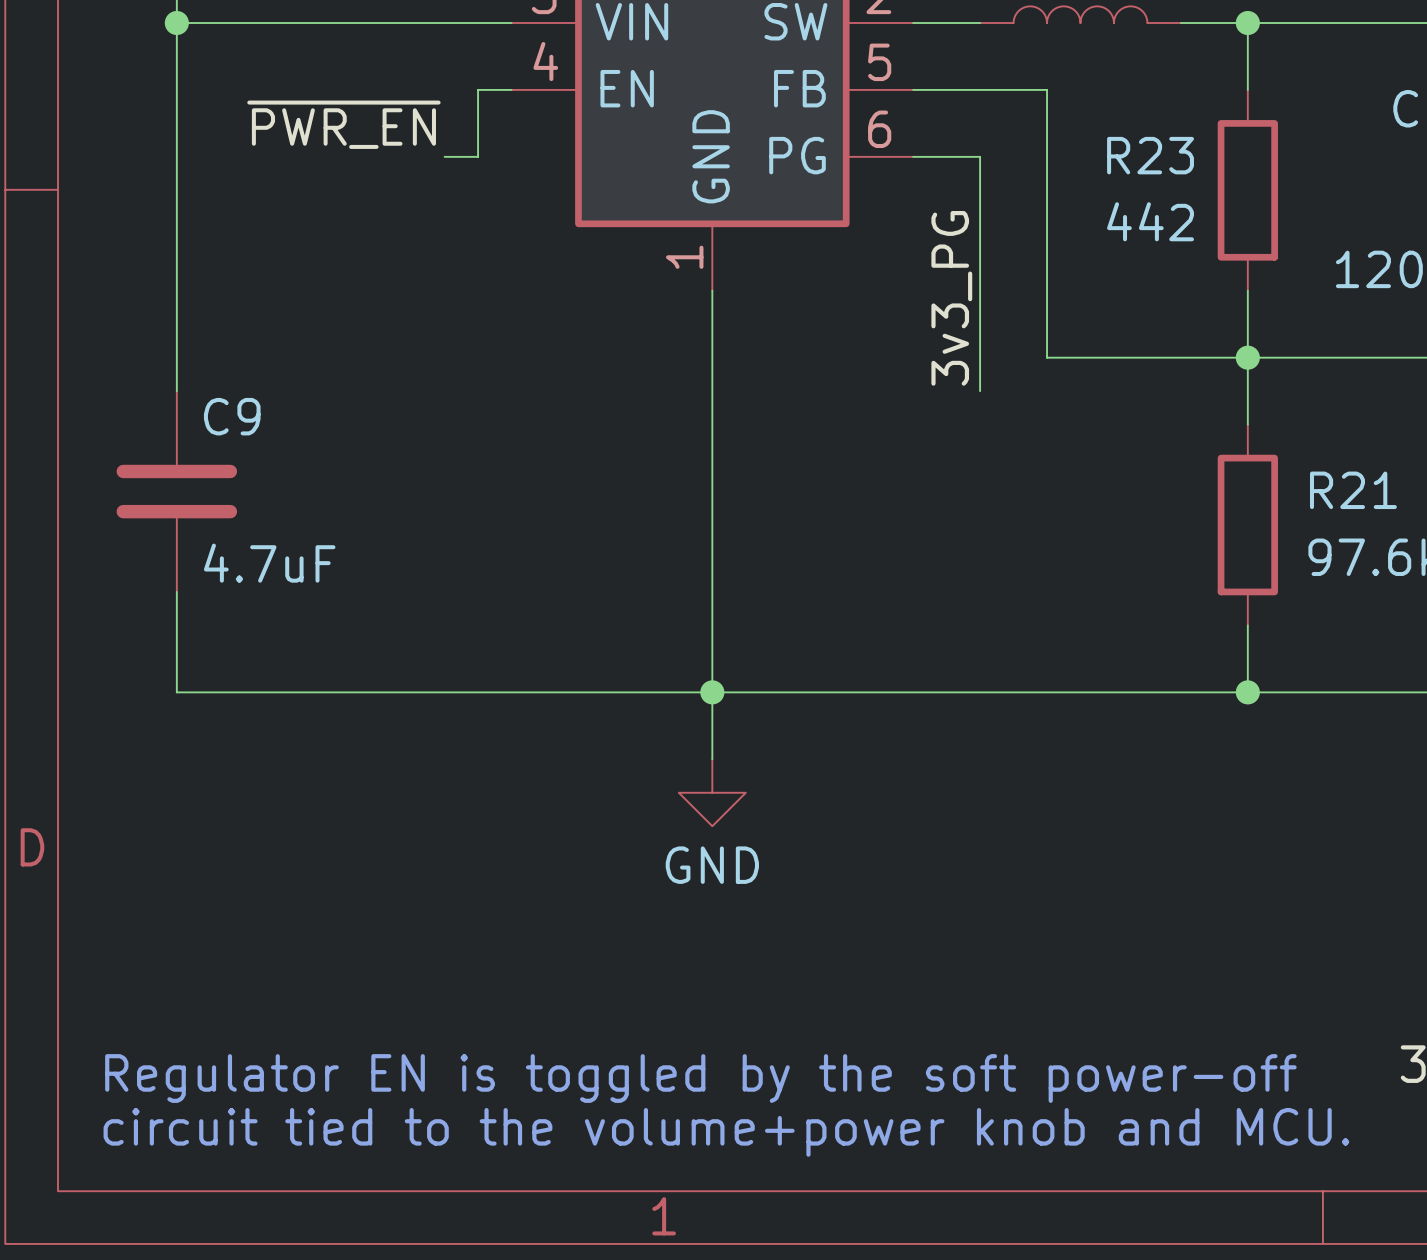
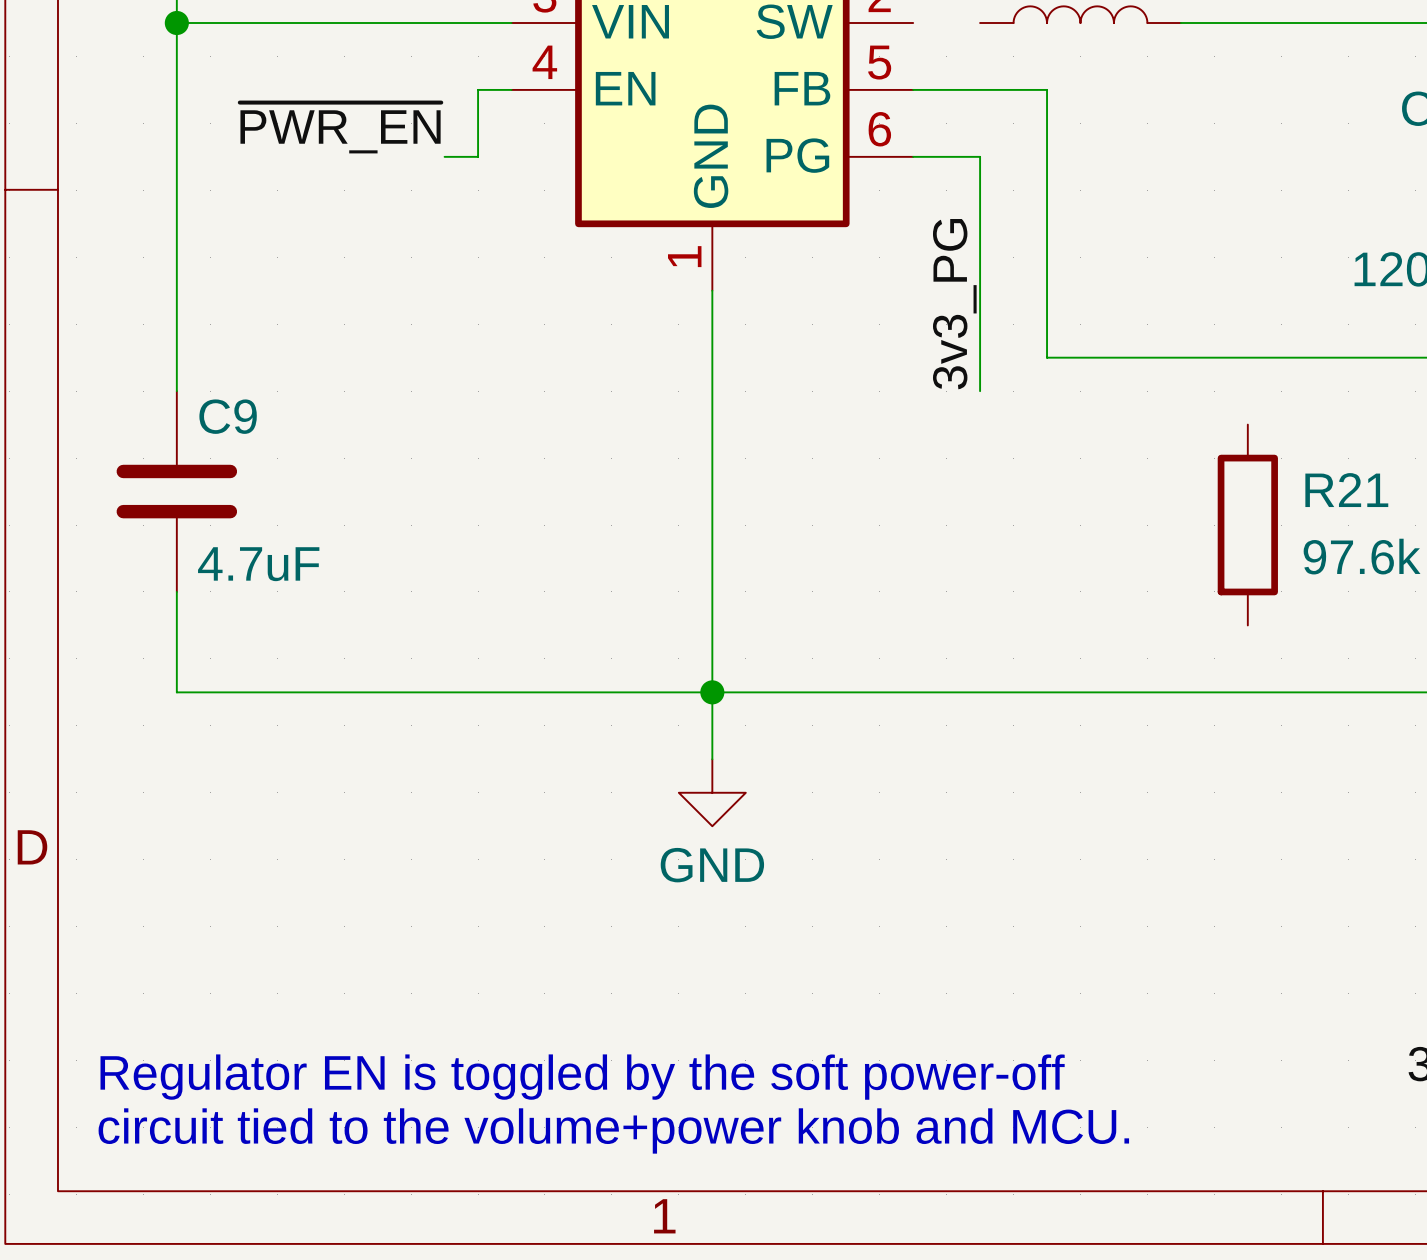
wire: (913, 23) (980, 23) -> none
wire: (1247, 23) (1247, 89) -> none
junction: (1247, 23) -> none
R23: 442 (1247, 190) -> none
wire: (1247, 290) (1247, 424) -> none
junction: (1247, 357) -> none
wire: (1247, 625) (1247, 692) -> none
junction: (1247, 692) -> none

